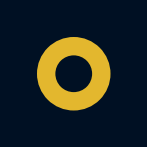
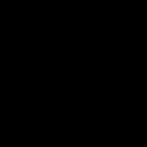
part: (73, 73) -> none

